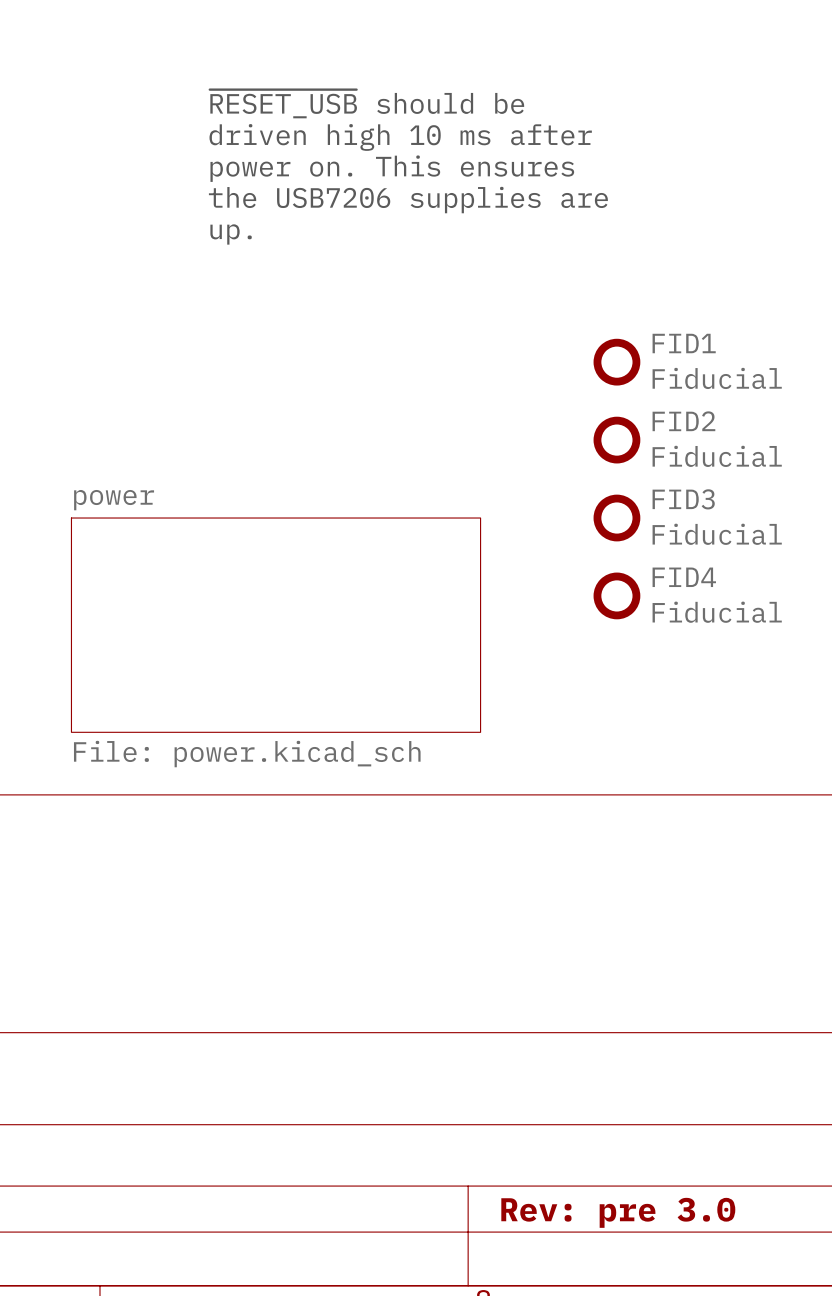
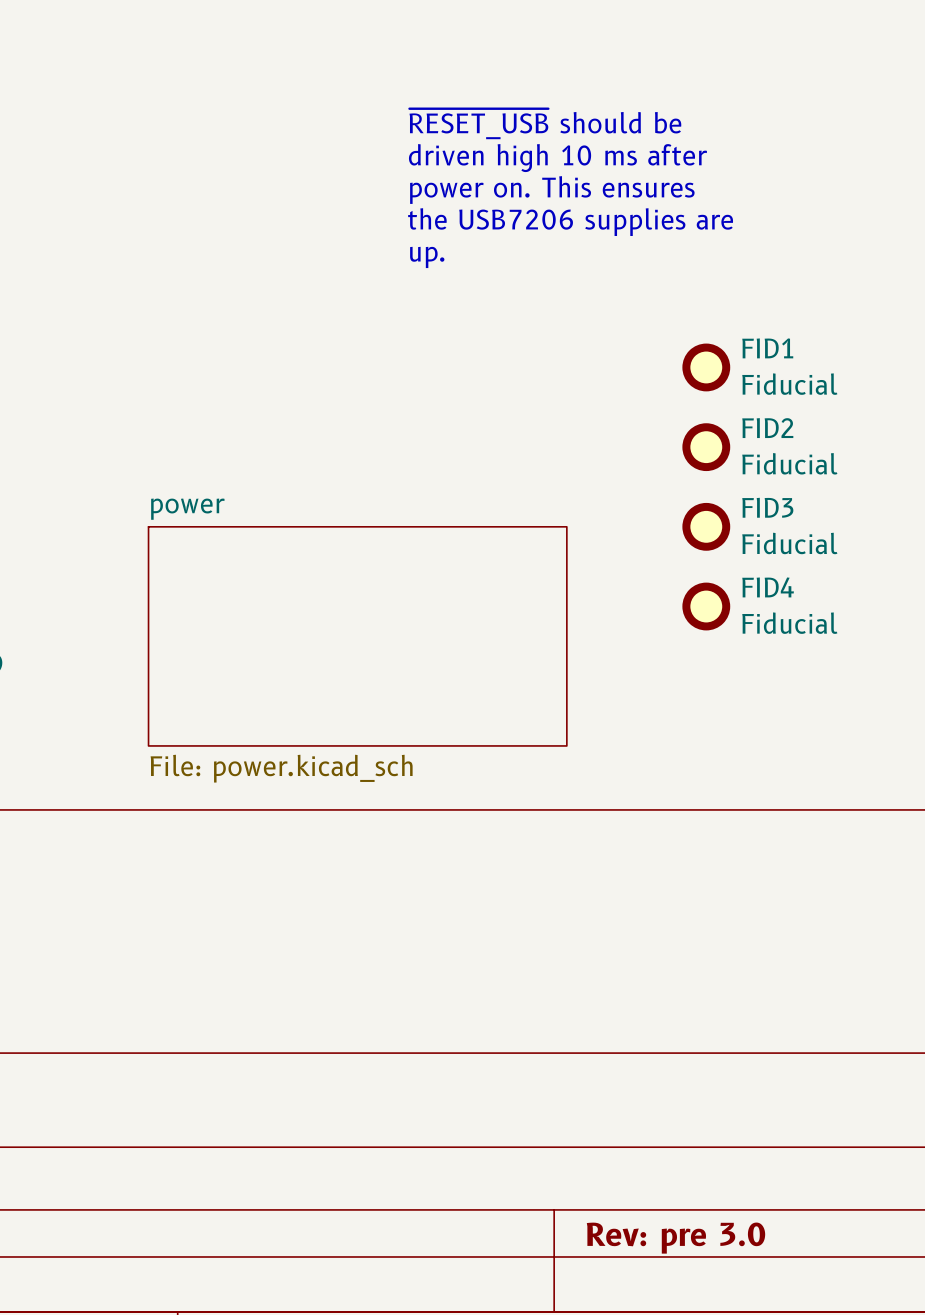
text position: ~{RESET_USB} should be (366, 103) -> ~{RESET_USB} should be (545, 123)
text position: driven high 10 ms after (400, 137) -> driven high 10 ms after (557, 158)
text position: power on. This ensures (392, 168) -> power on. This ensures (552, 190)
text position: the USB7206 supplies are (408, 200) -> the USB7206 supplies are (570, 222)
text position: up. (231, 234) -> up. (427, 257)

